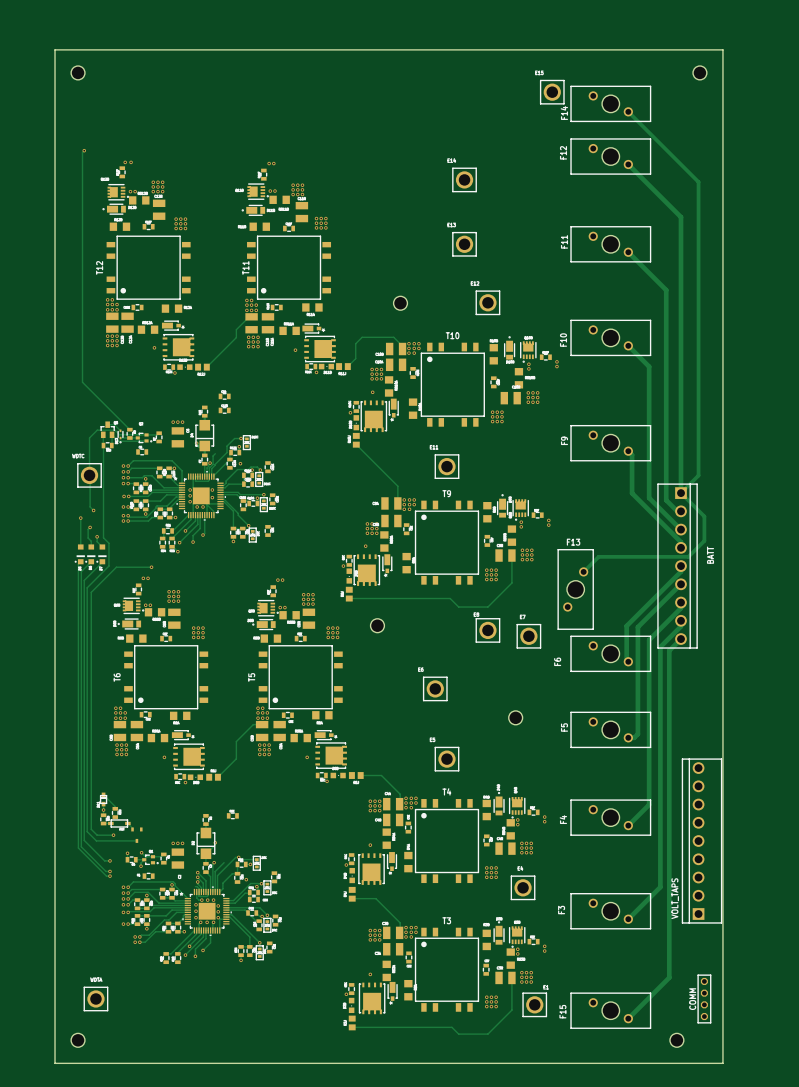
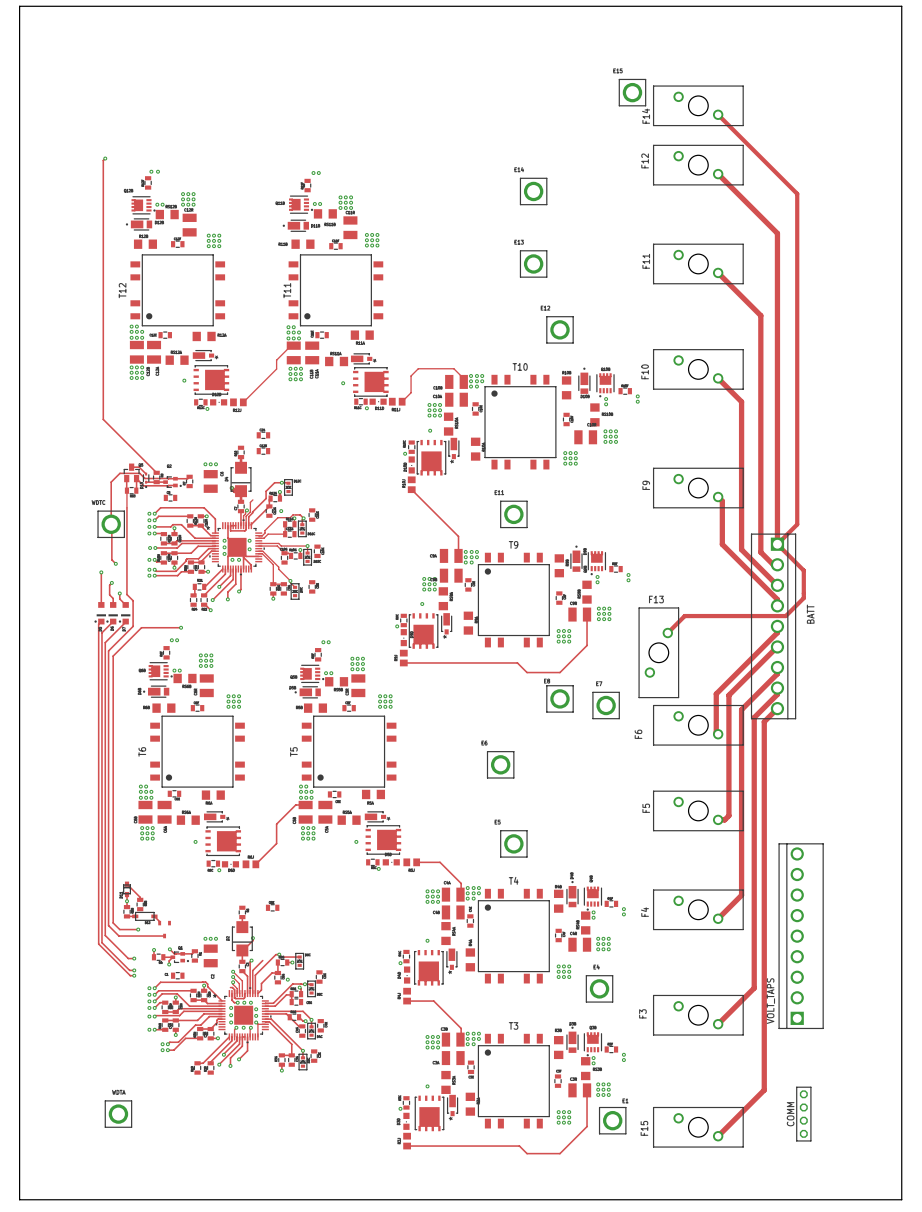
board edge: (55, 49) (722, 49) (722, 1063) (55, 1063) (55, 49) -> (19, 6) (19, 1199) (901, 1199) (901, 6) (19, 6)
hole: (78, 72) -> none
hole: (699, 72) -> none
hole: (400, 303) -> none
hole: (377, 625) -> none
hole: (515, 717) -> none
hole: (78, 1040) -> none
hole: (676, 1040) -> none

